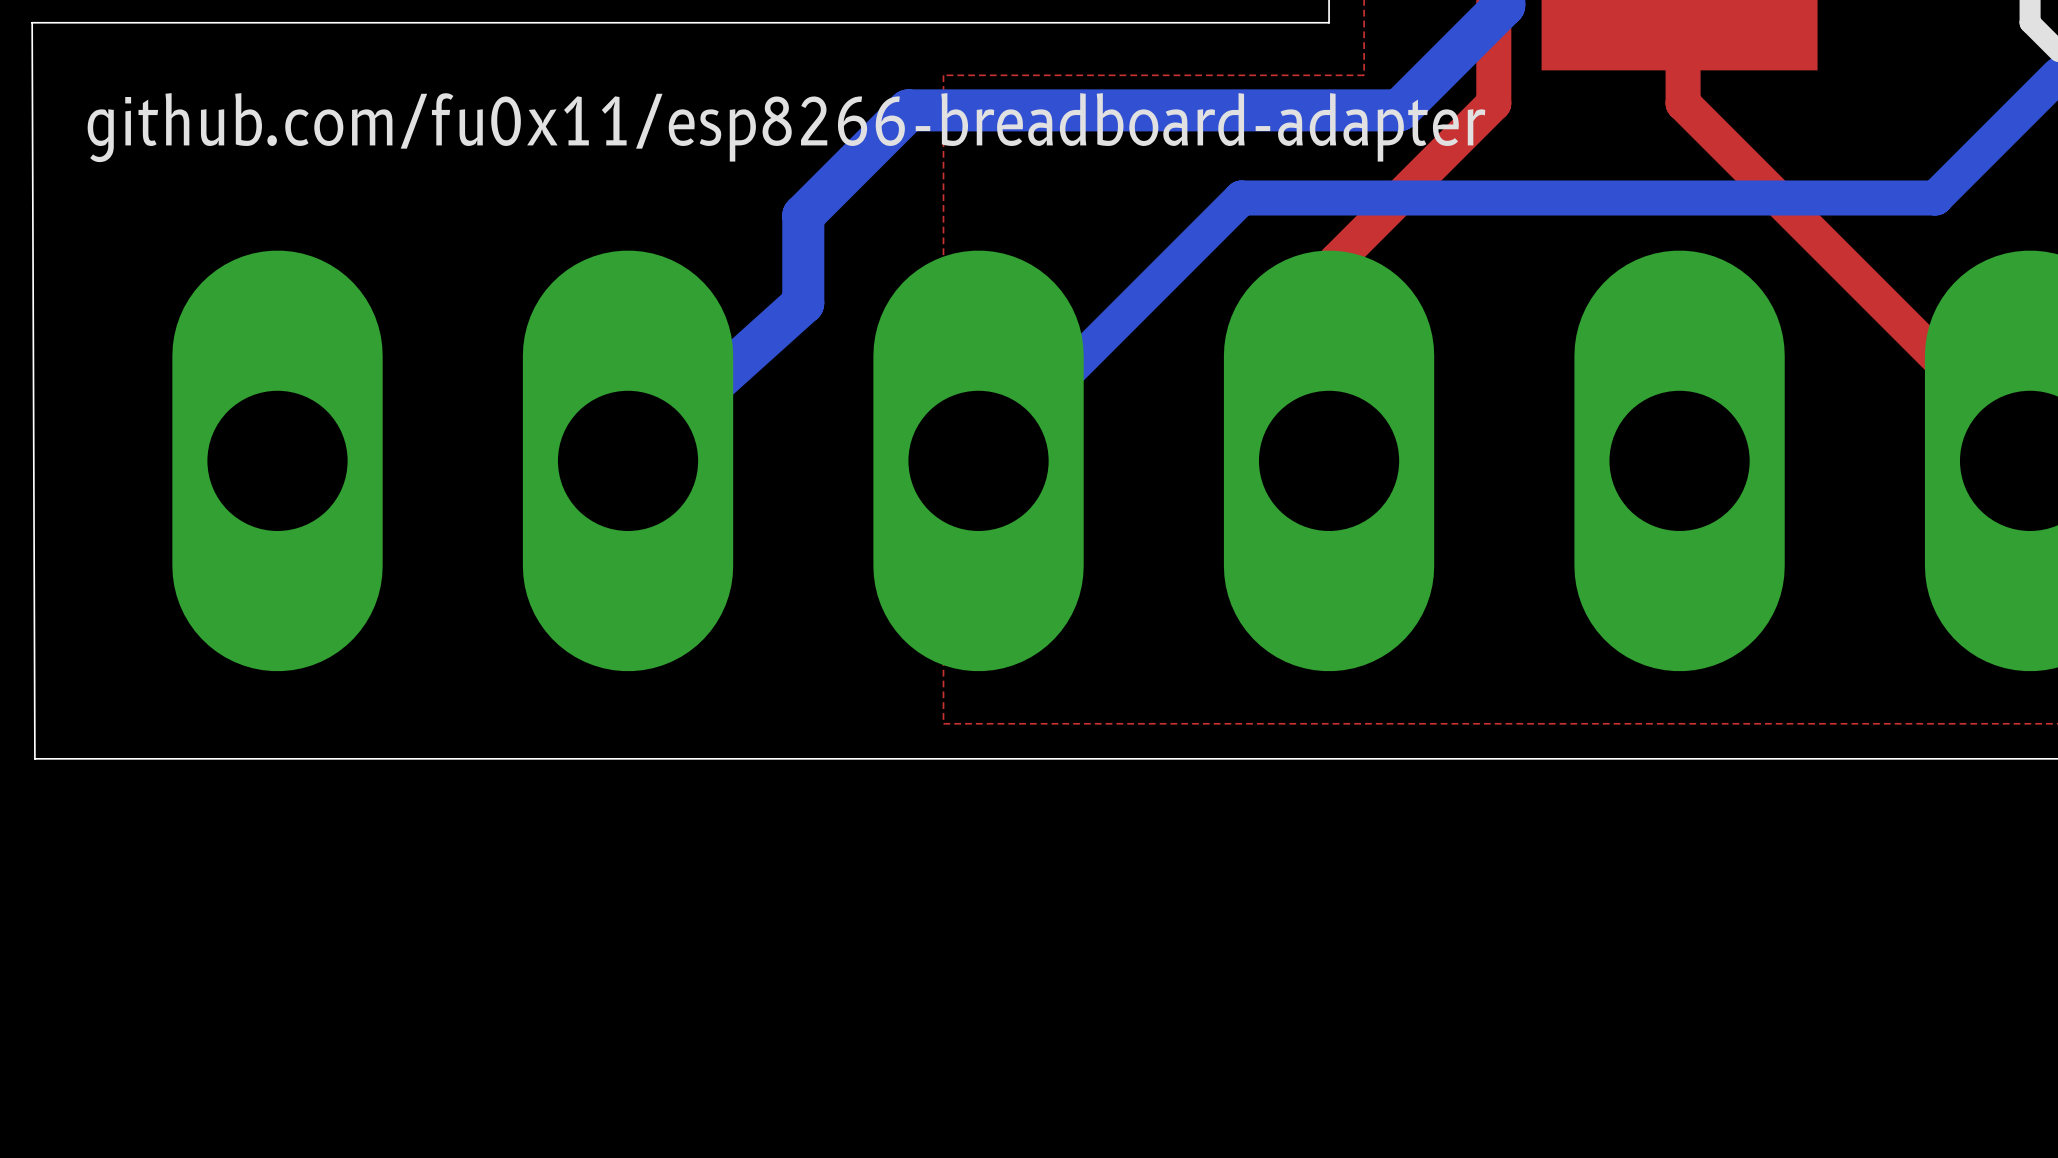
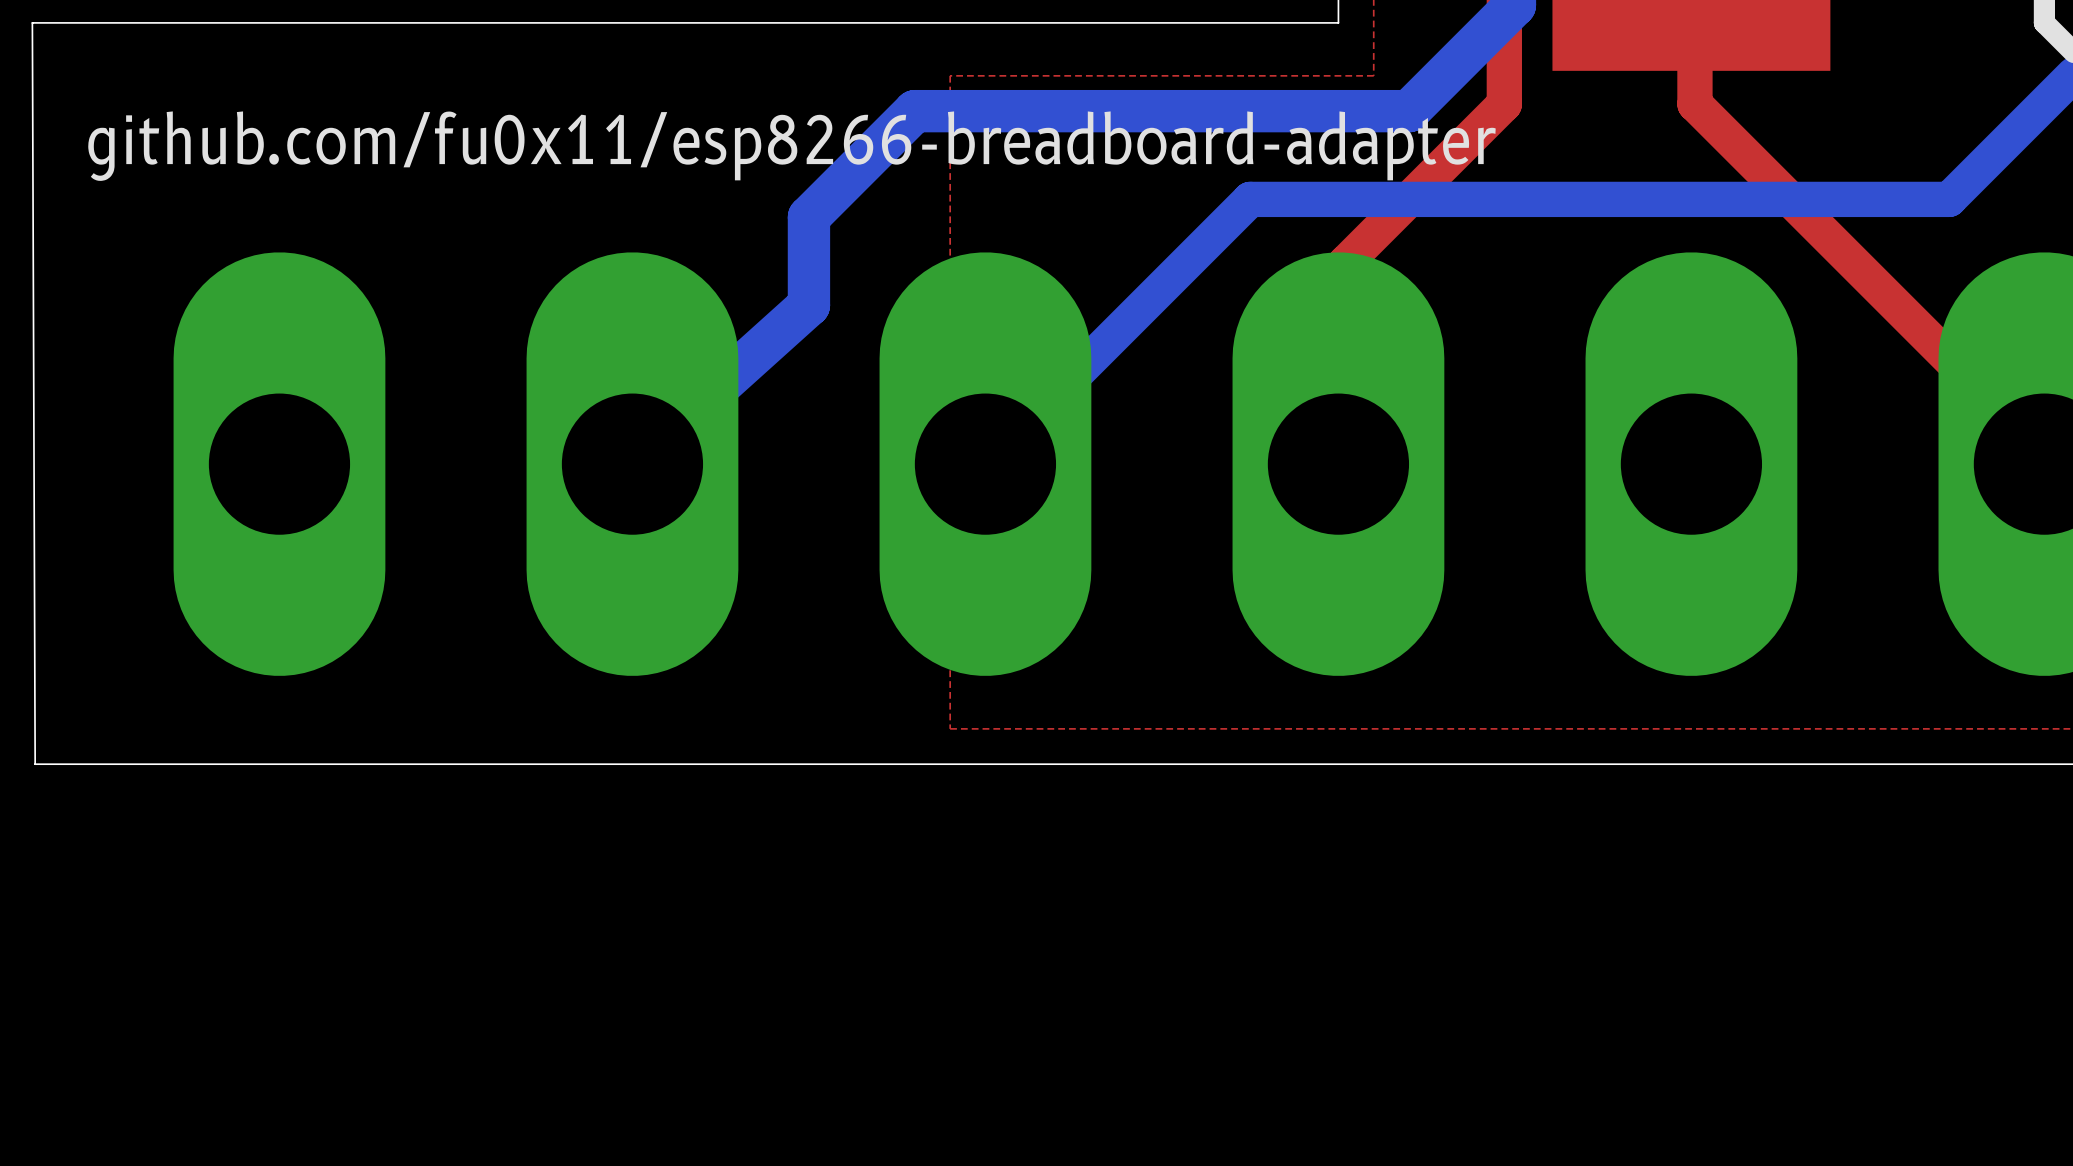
text position: github.com/fu0x11/esp8266-breadboard-adapter (786, 127) -> github.com/fu0x11/esp8266-breadboard-adapter (791, 146)

